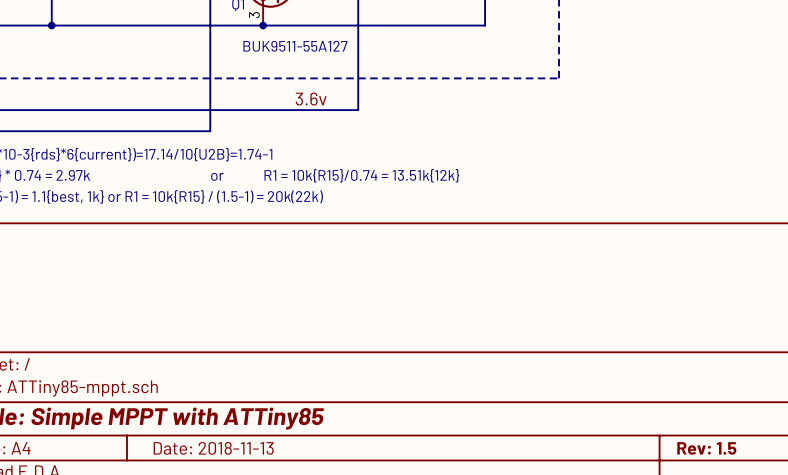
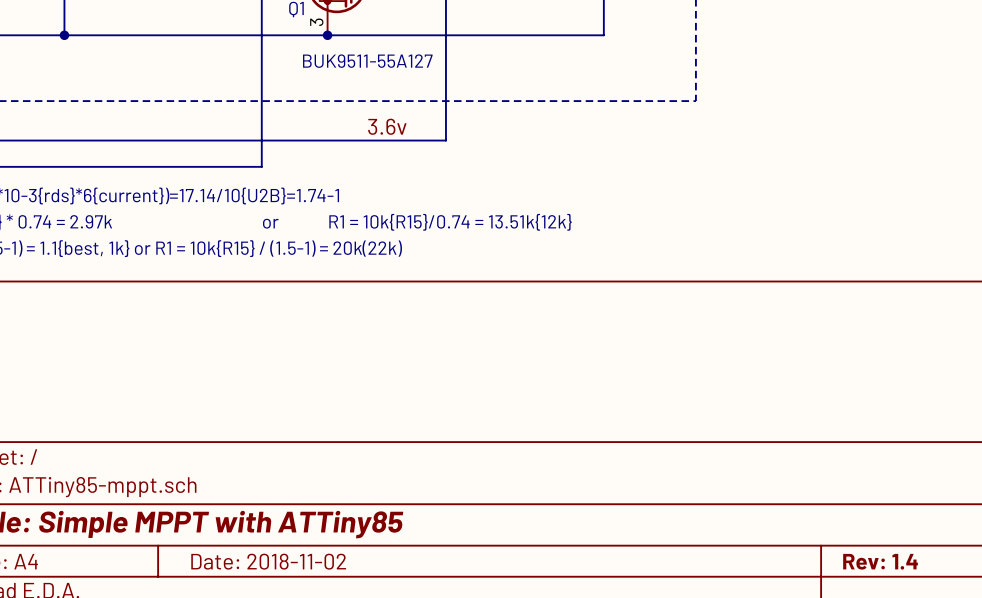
title block: Date: 2018-11-13 (213, 448) -> Date: 2018-11-02 (268, 561)
title block: Rev: 1.5 (706, 448) -> Rev: 1.4 (880, 561)

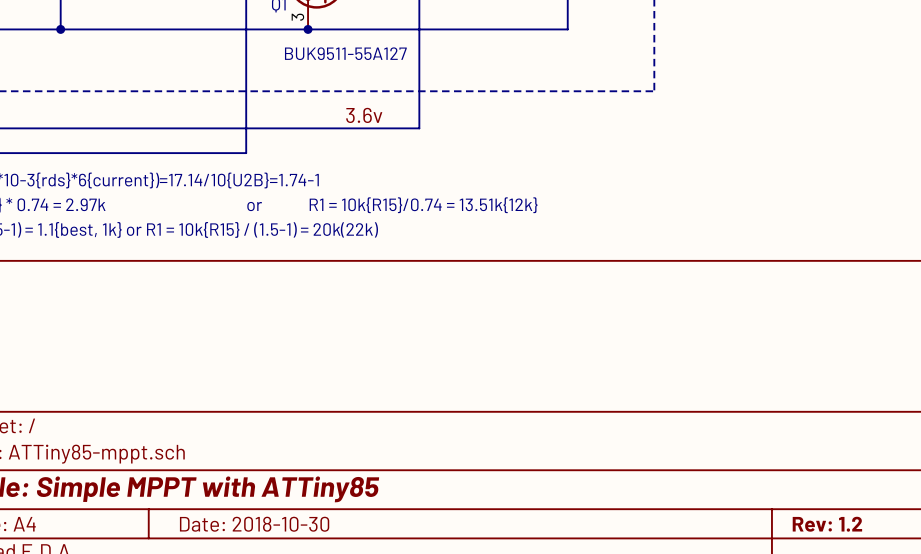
title block: Date: 2018-11-02 (268, 561) -> Date: 2018-10-30 (254, 524)
title block: Rev: 1.4 (880, 561) -> Rev: 1.2 (827, 524)

